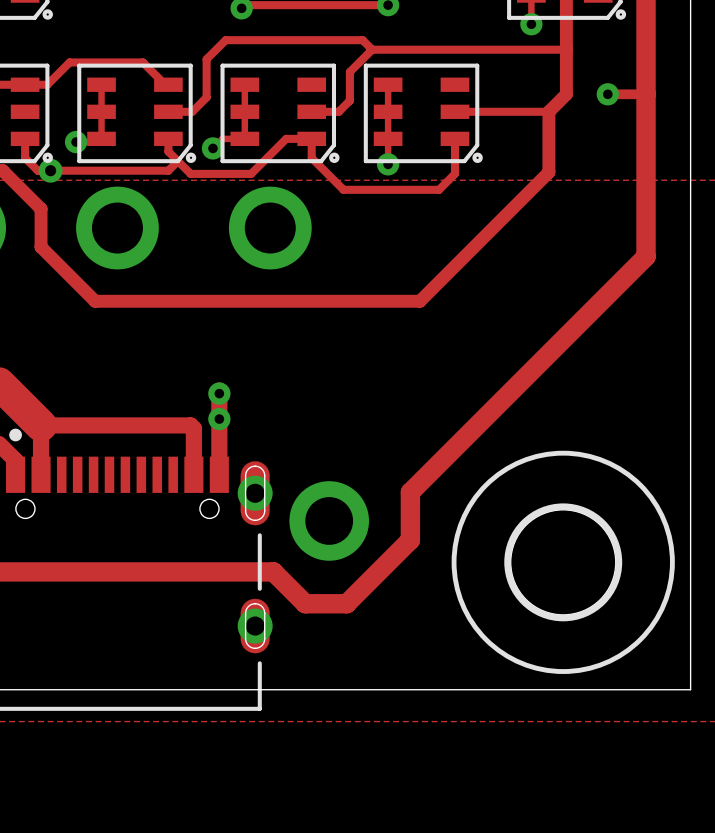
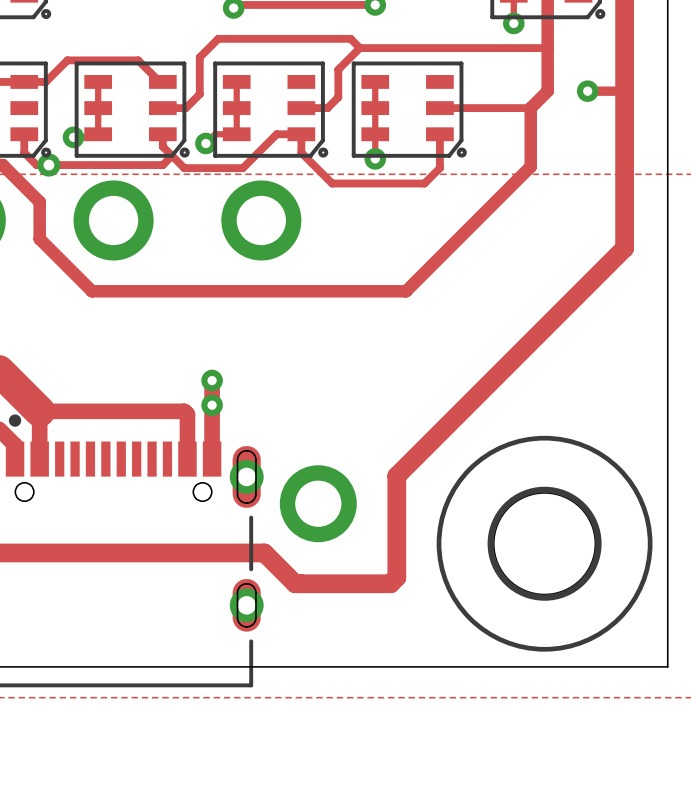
track: (410, 540) (346, 603) -> (396, 522) (396, 577) (390, 583) (335, 583)

